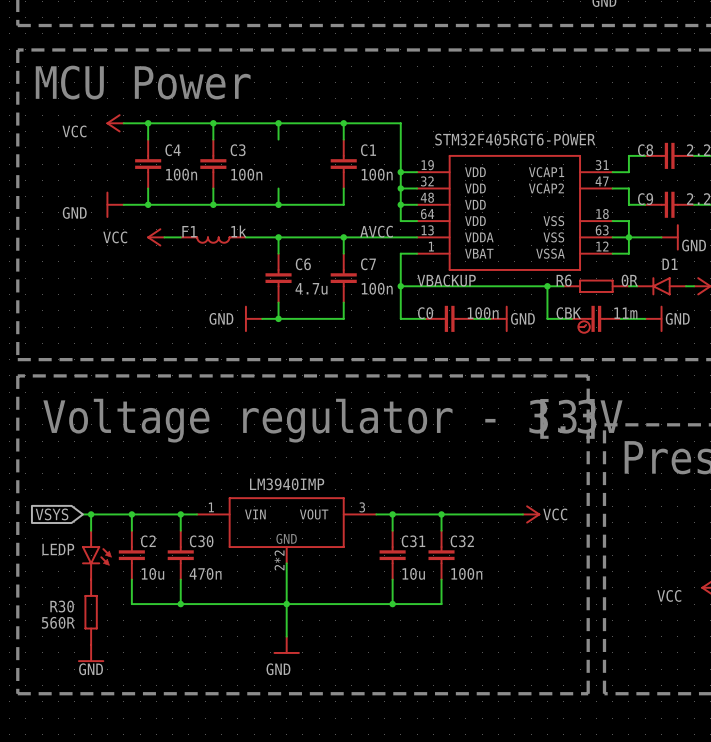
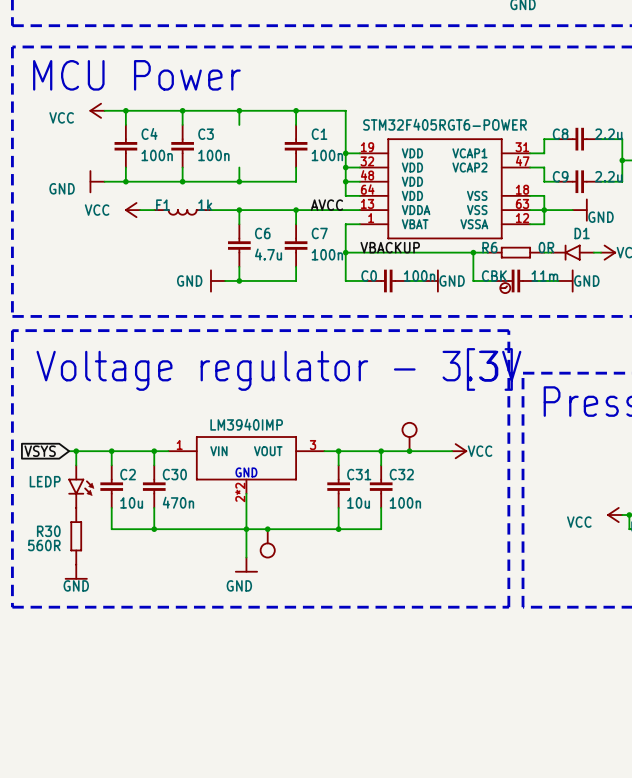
part: none -> (409, 436)
junction: none -> (409, 451)
junction: none -> (267, 529)
part: none -> (267, 543)

